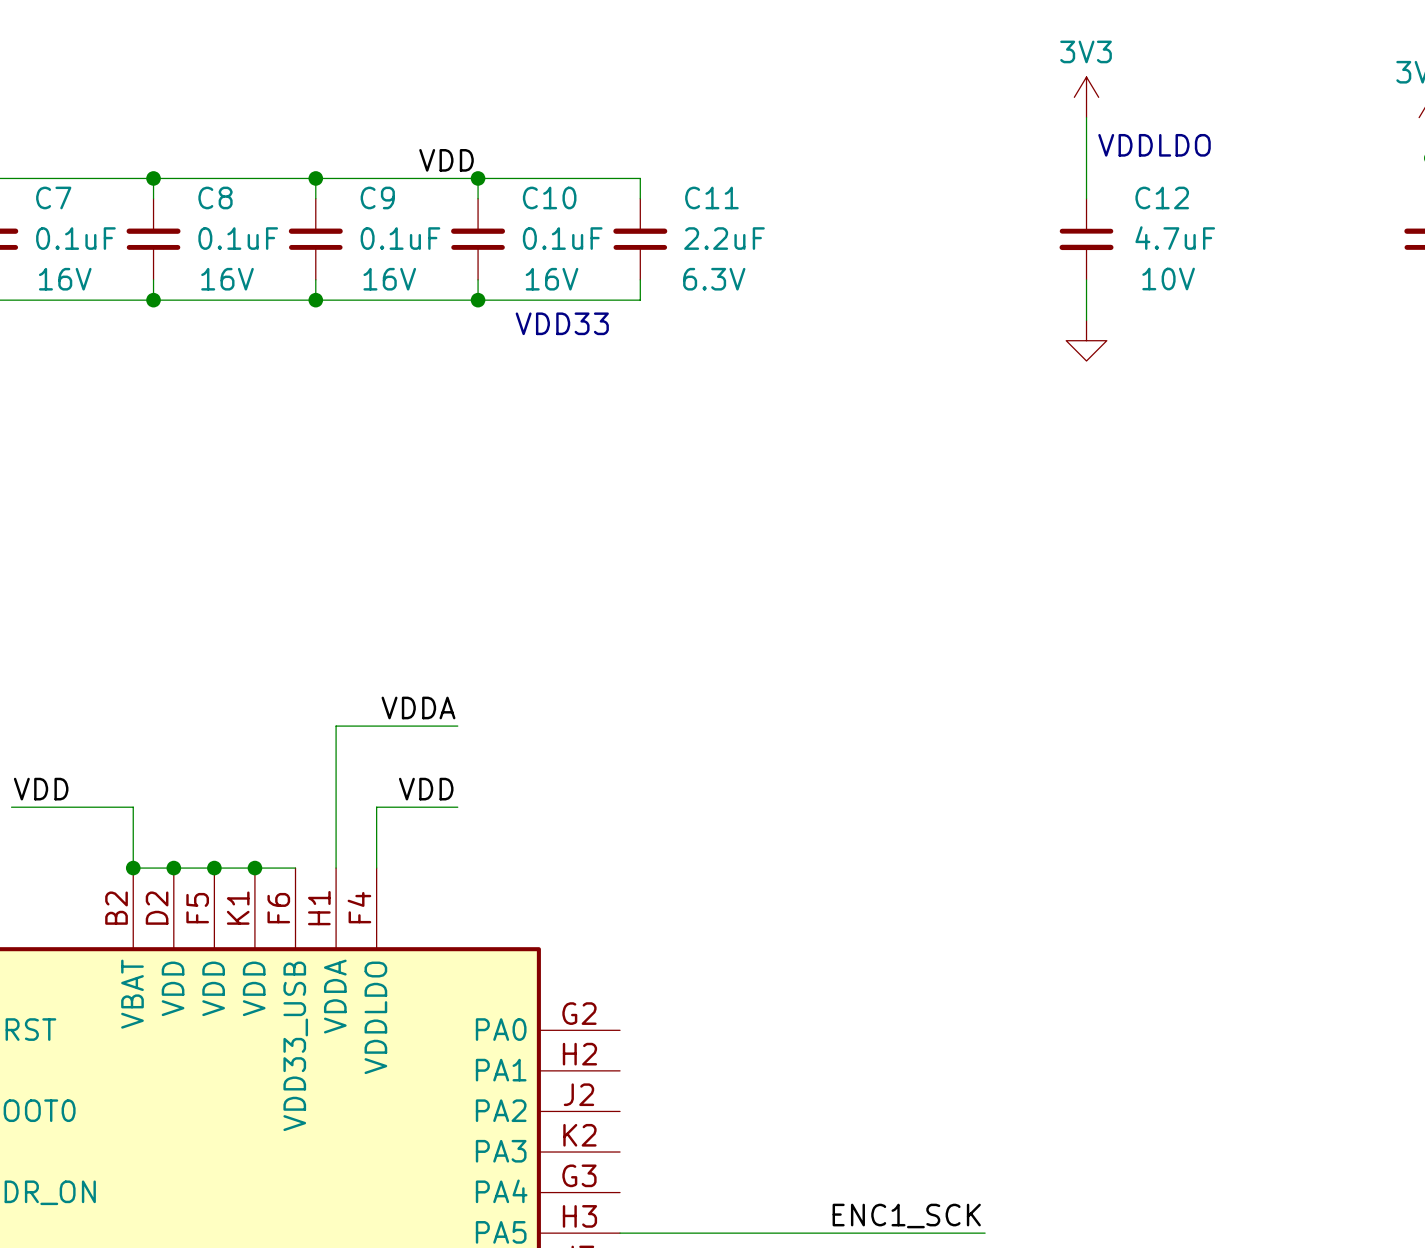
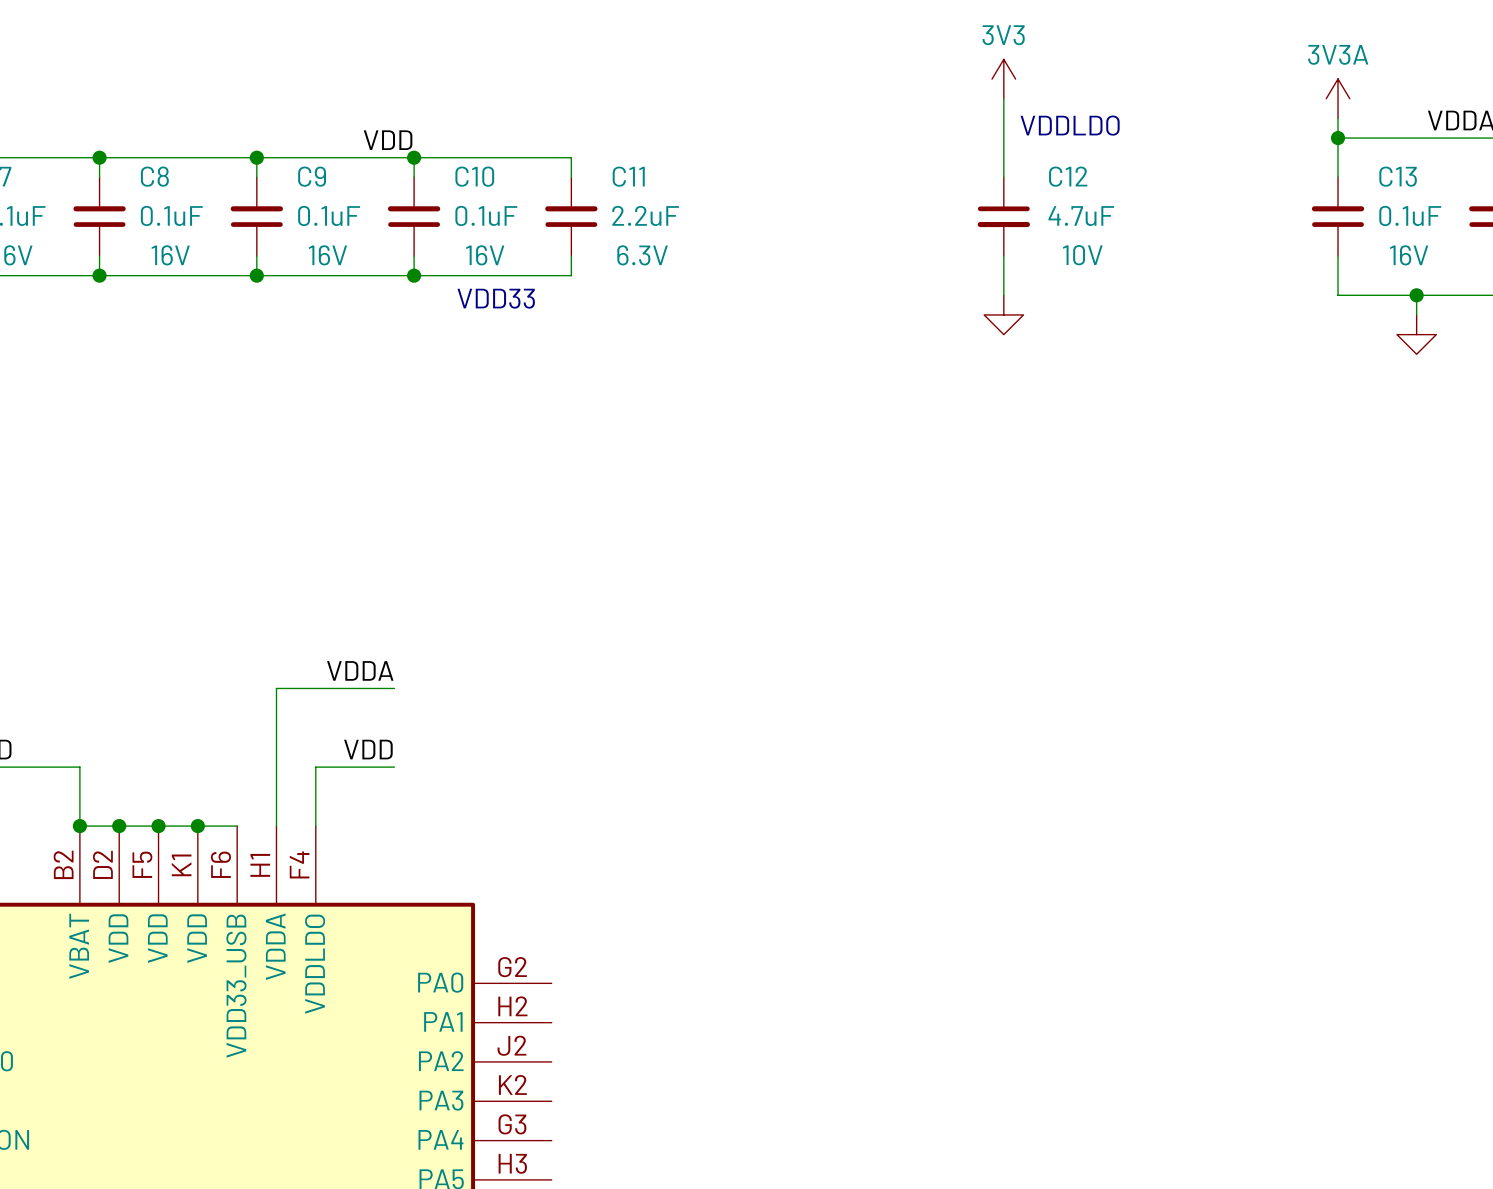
label: ENC1_SCK (906, 1216) -> none
wire: (620, 1233) (985, 1233) -> none

